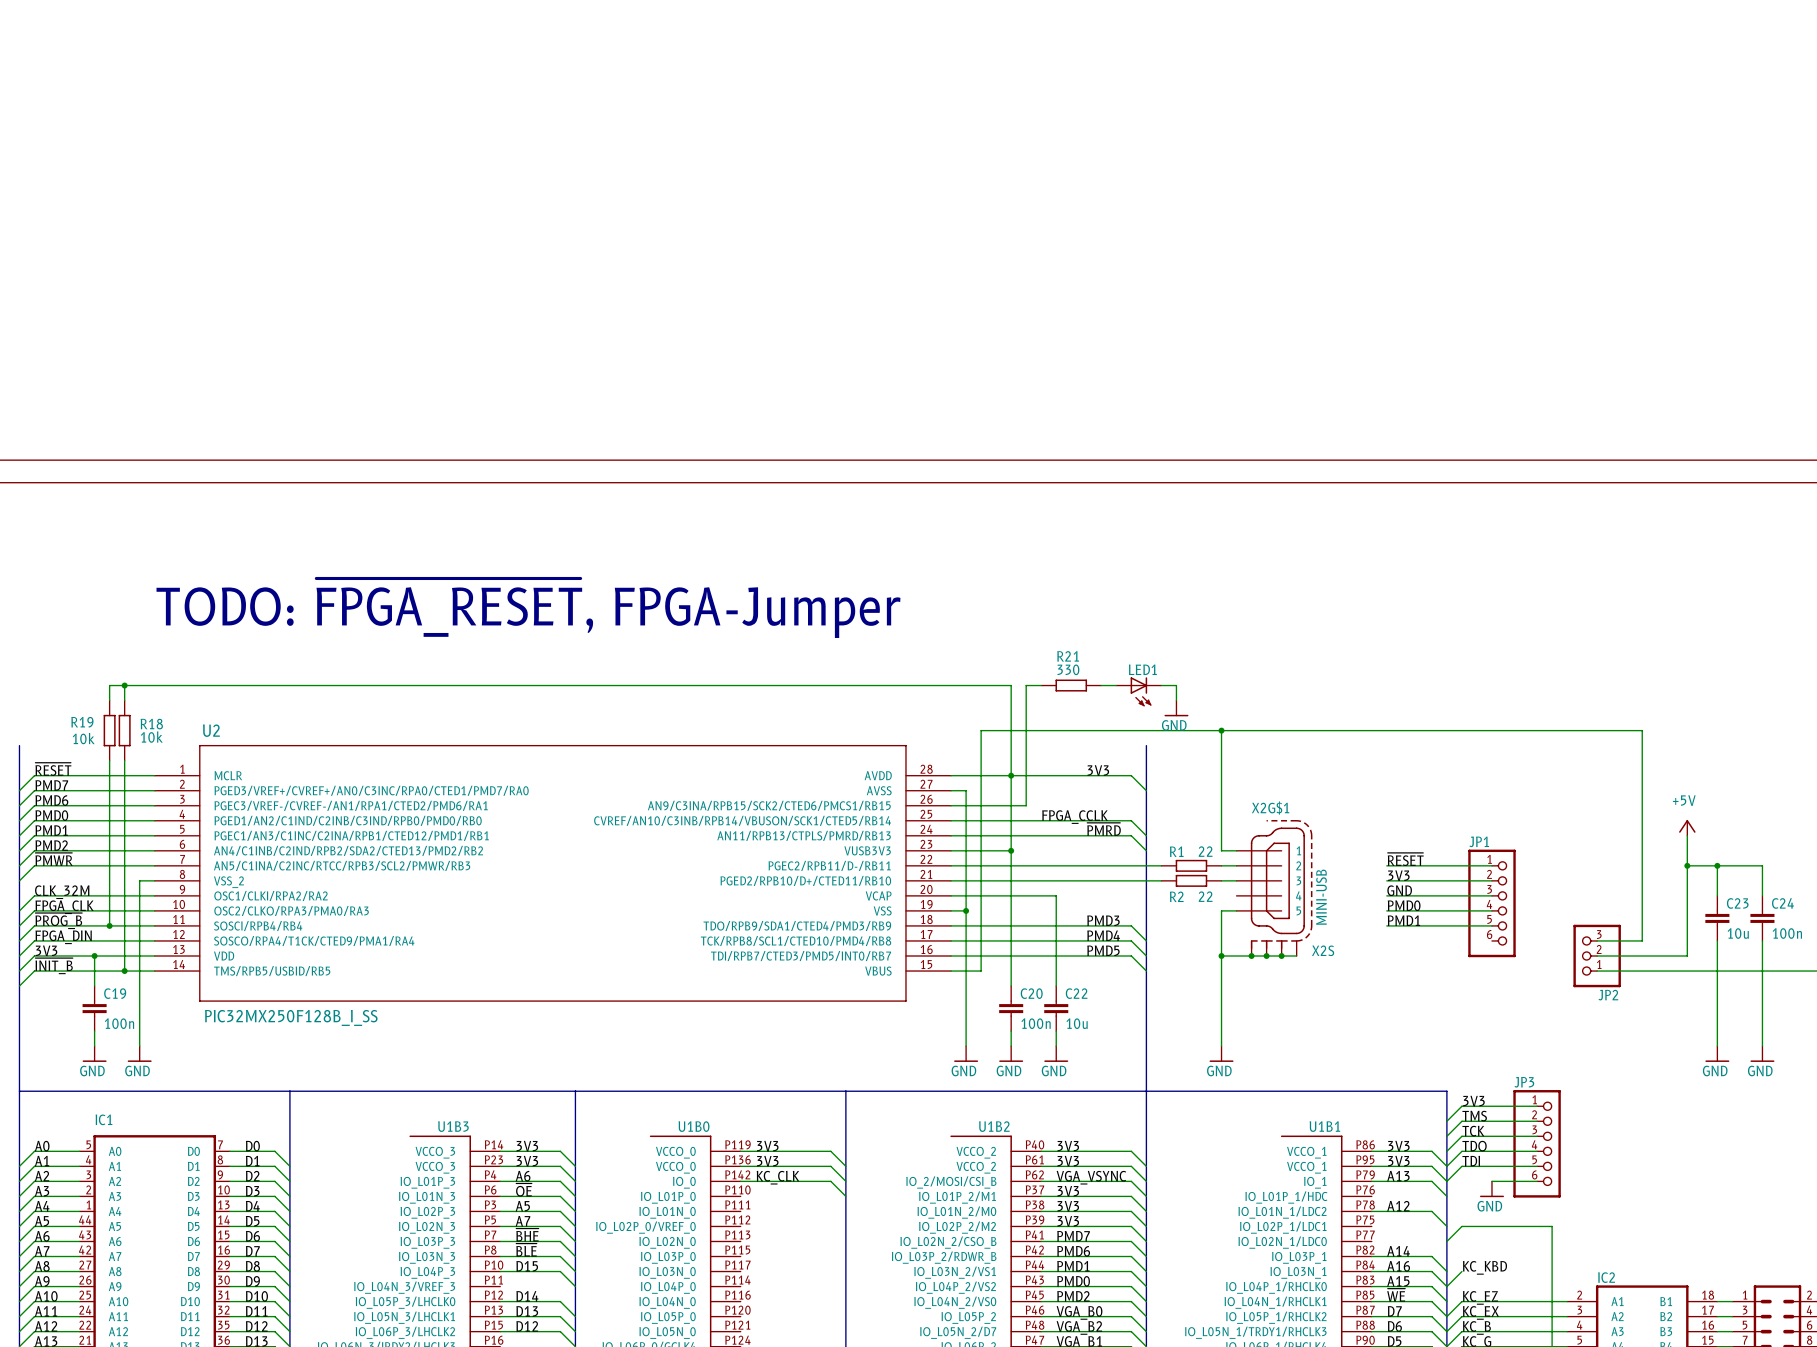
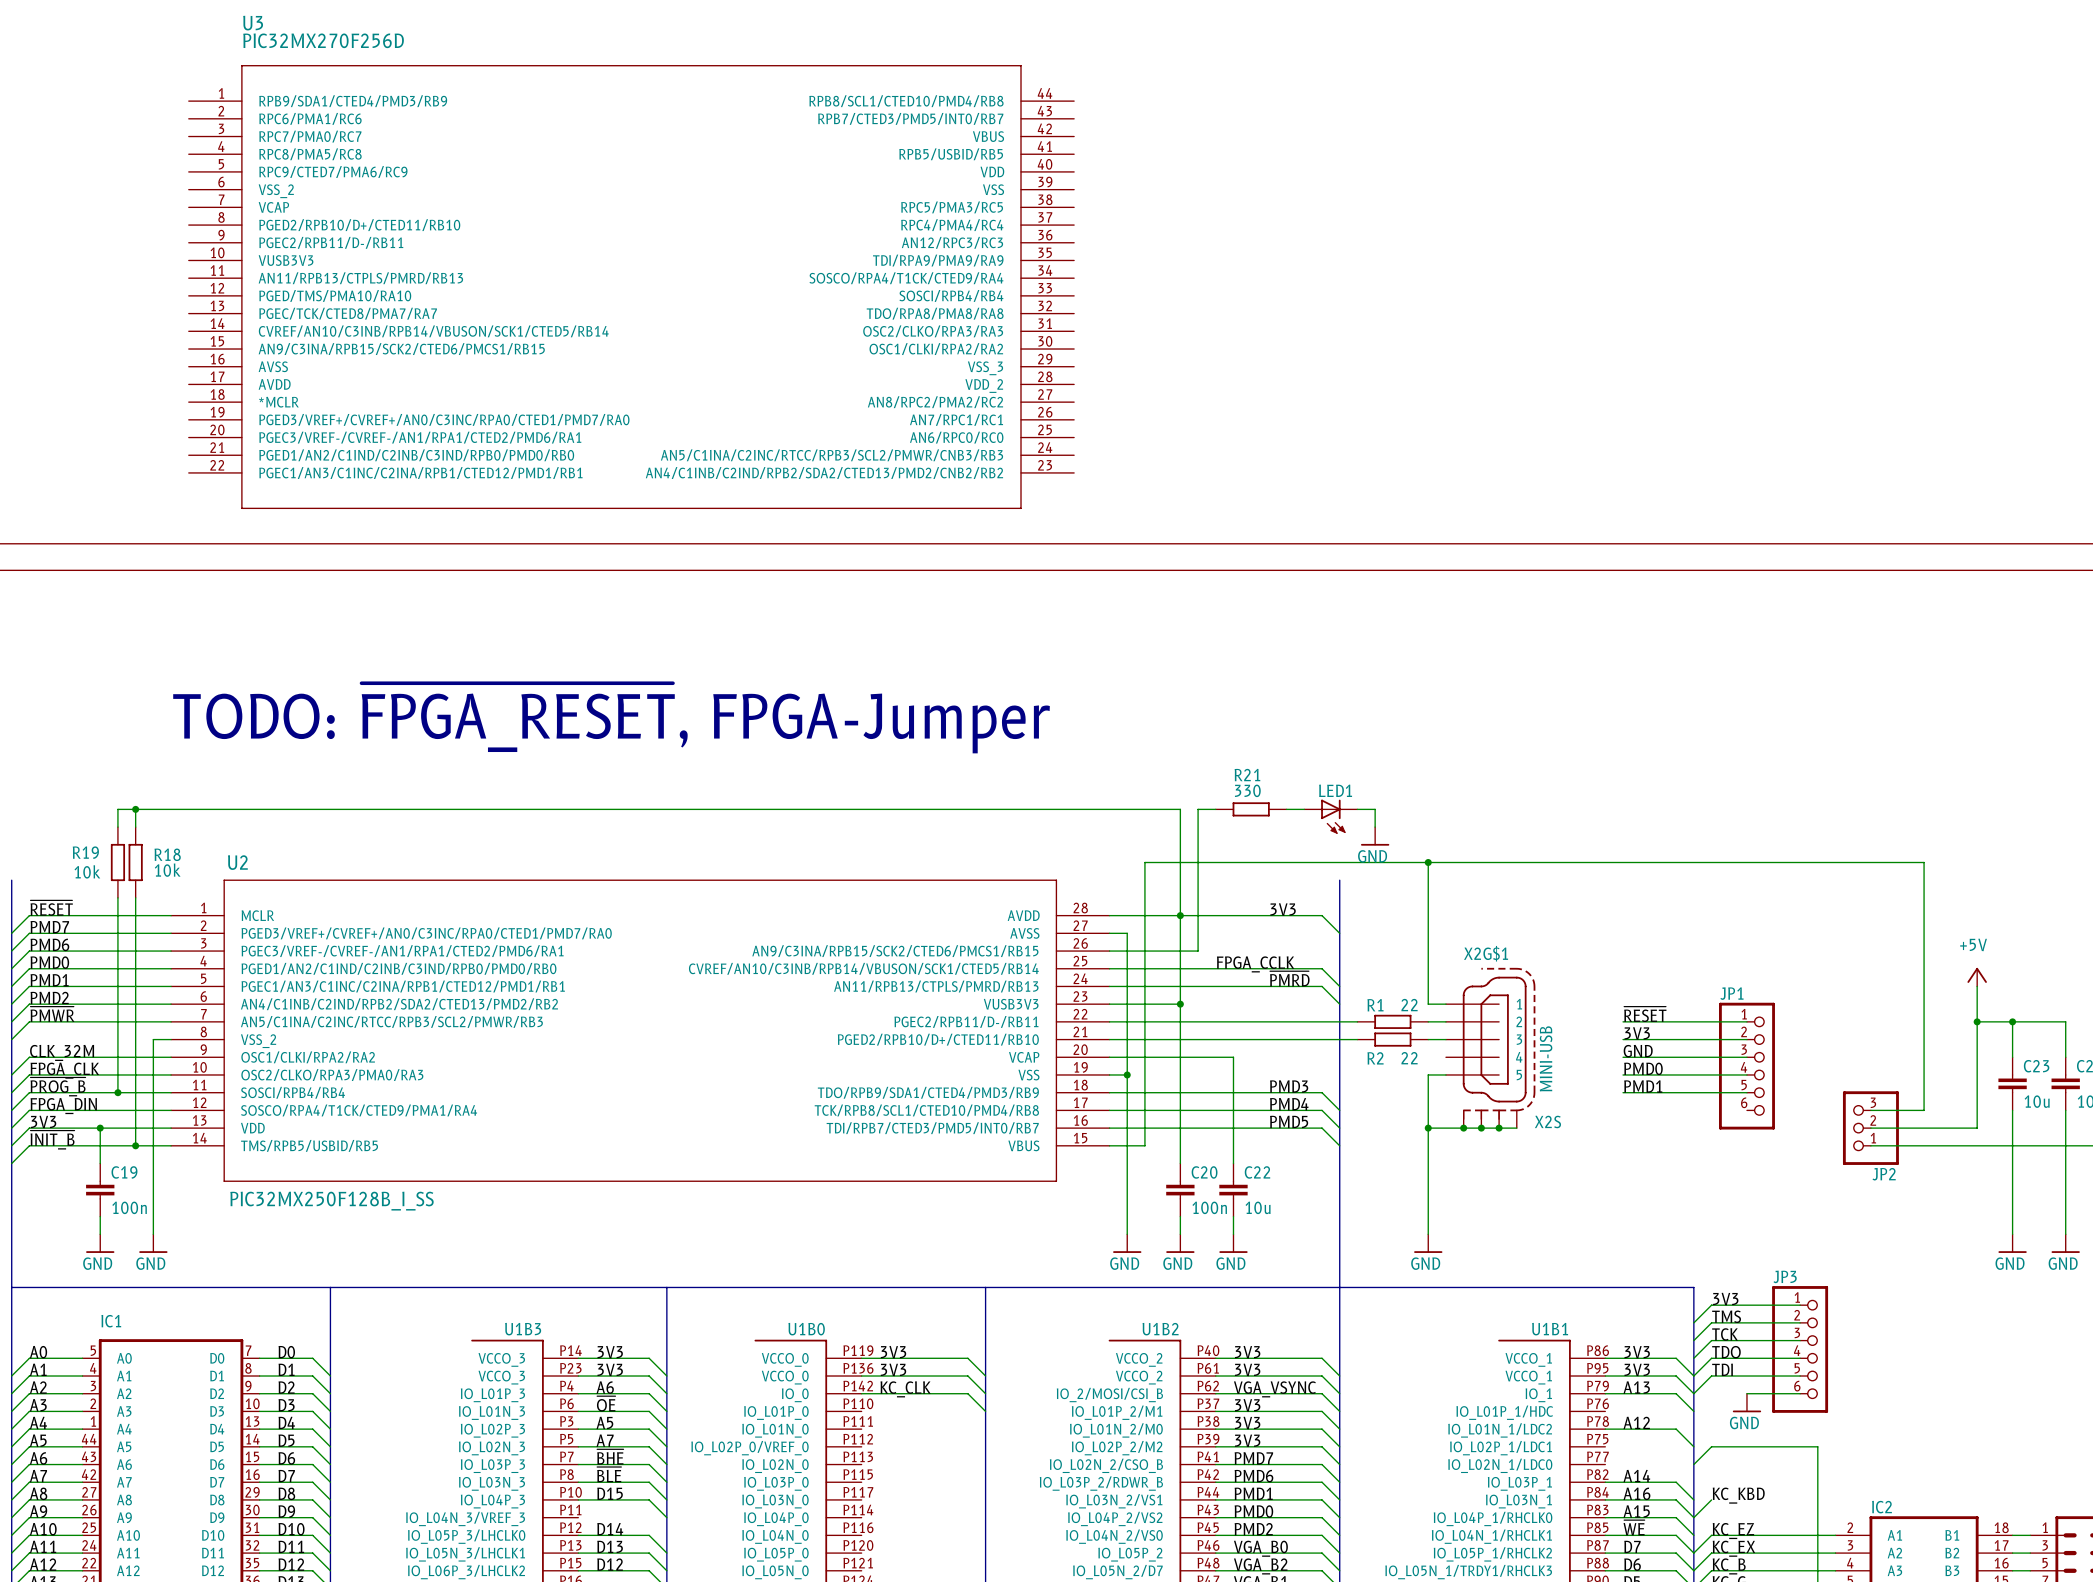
U3: none -> PIC32MX270F256D (631, 287)

